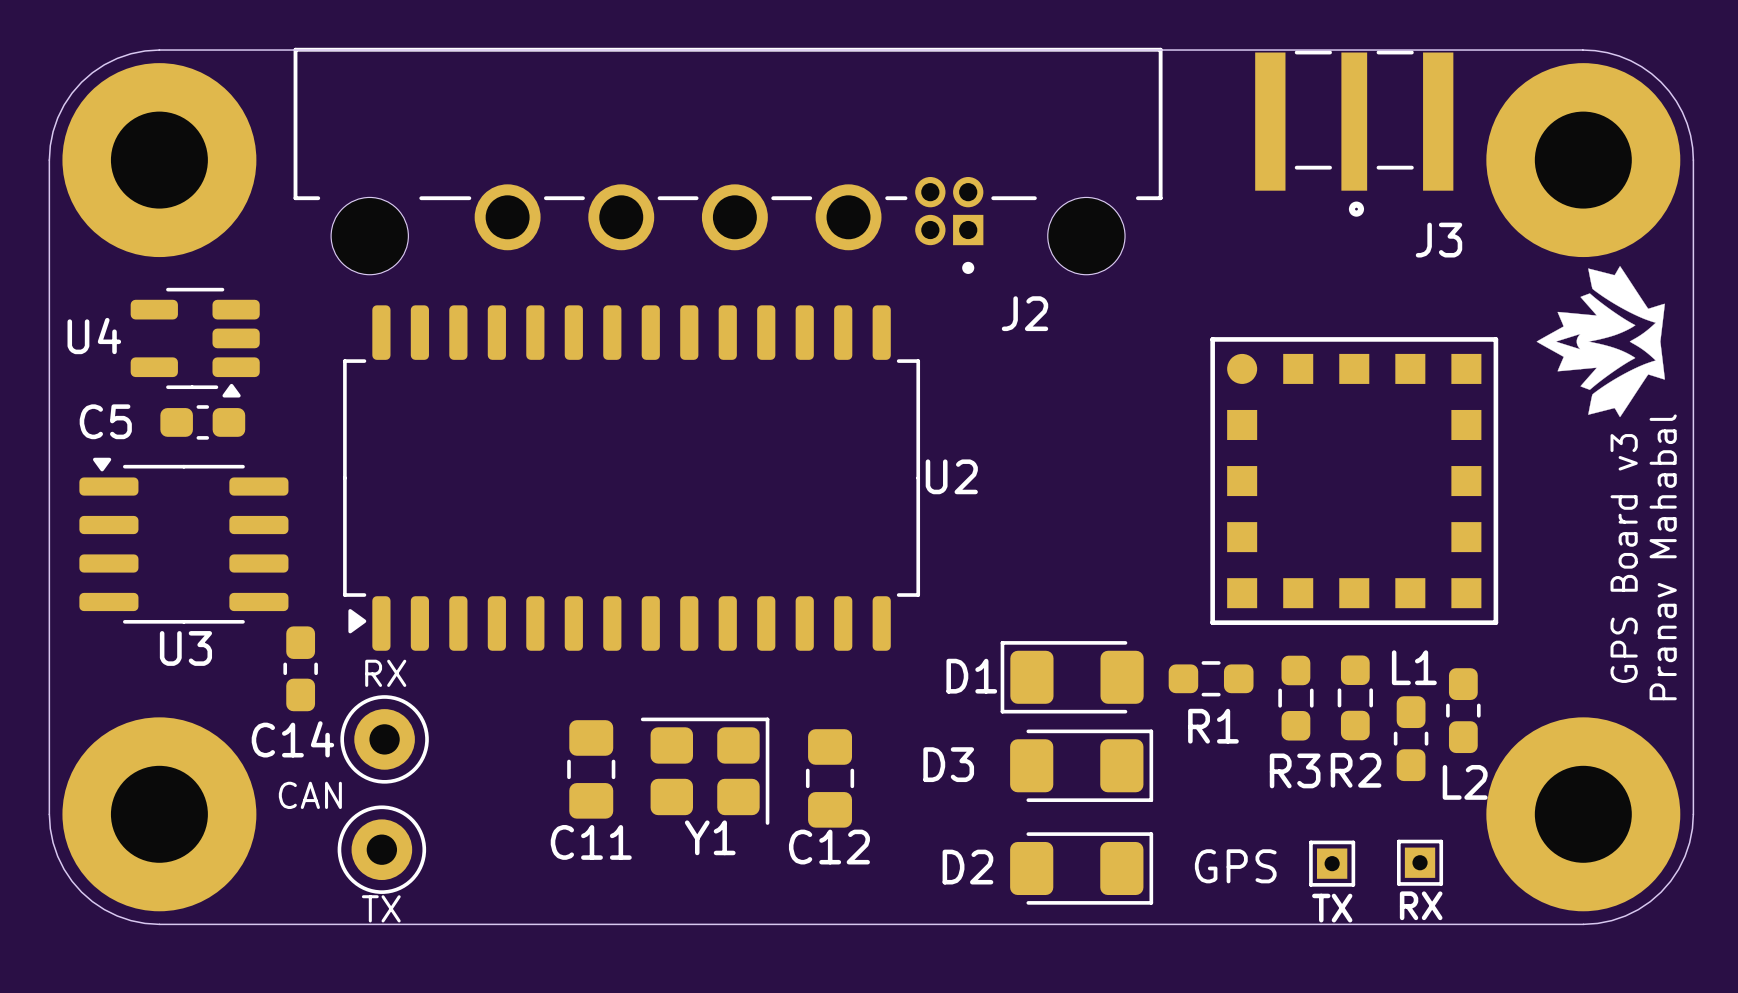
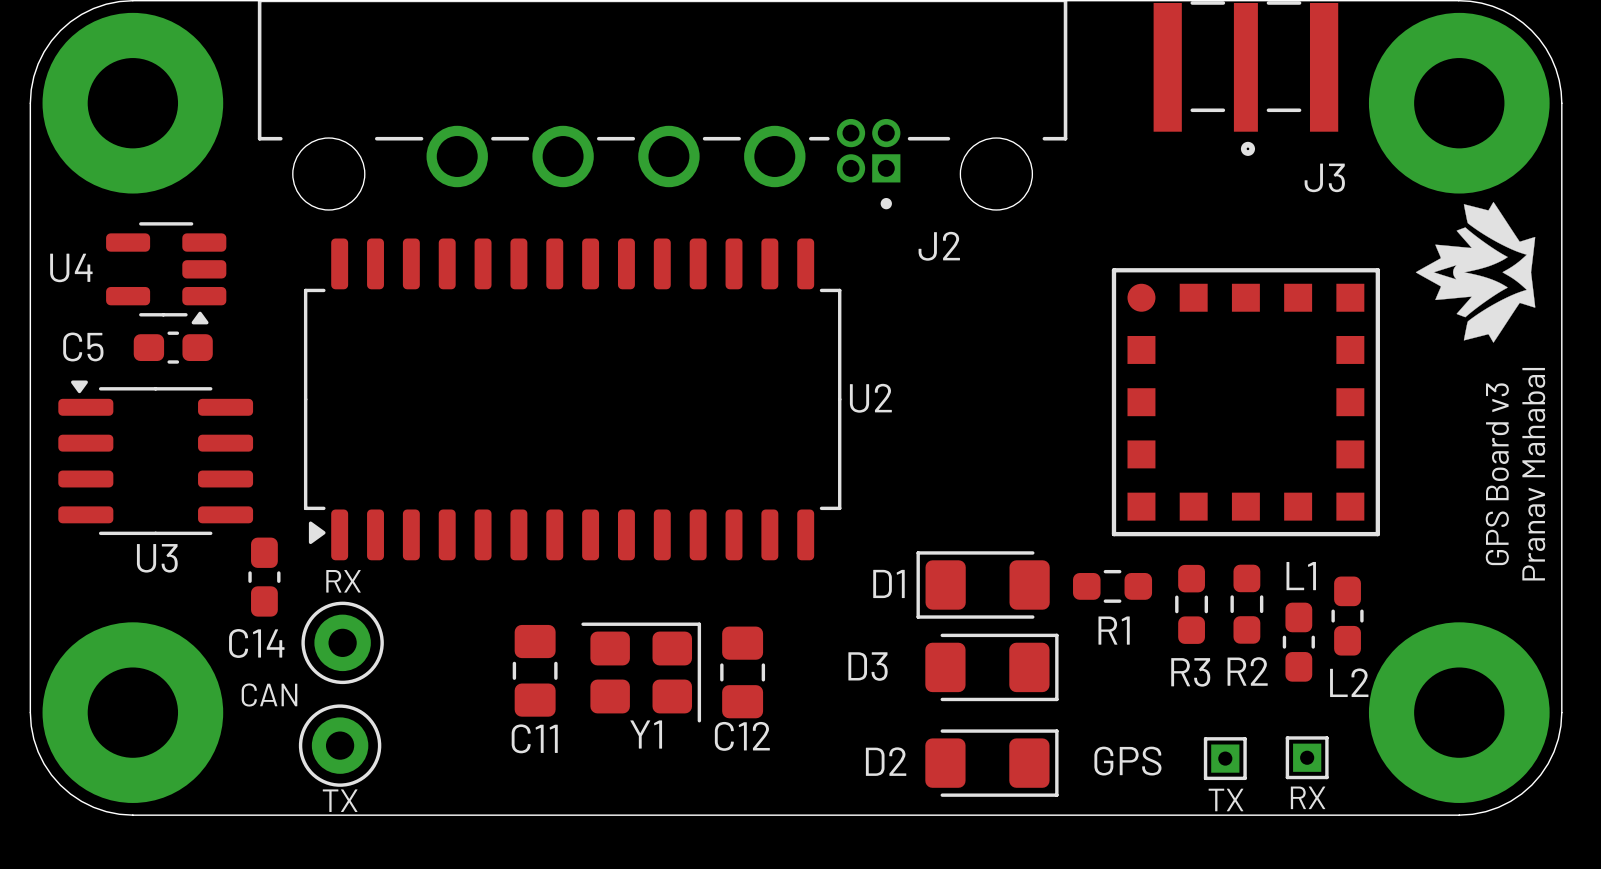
C12 position: (830, 778) -> (742, 672)

